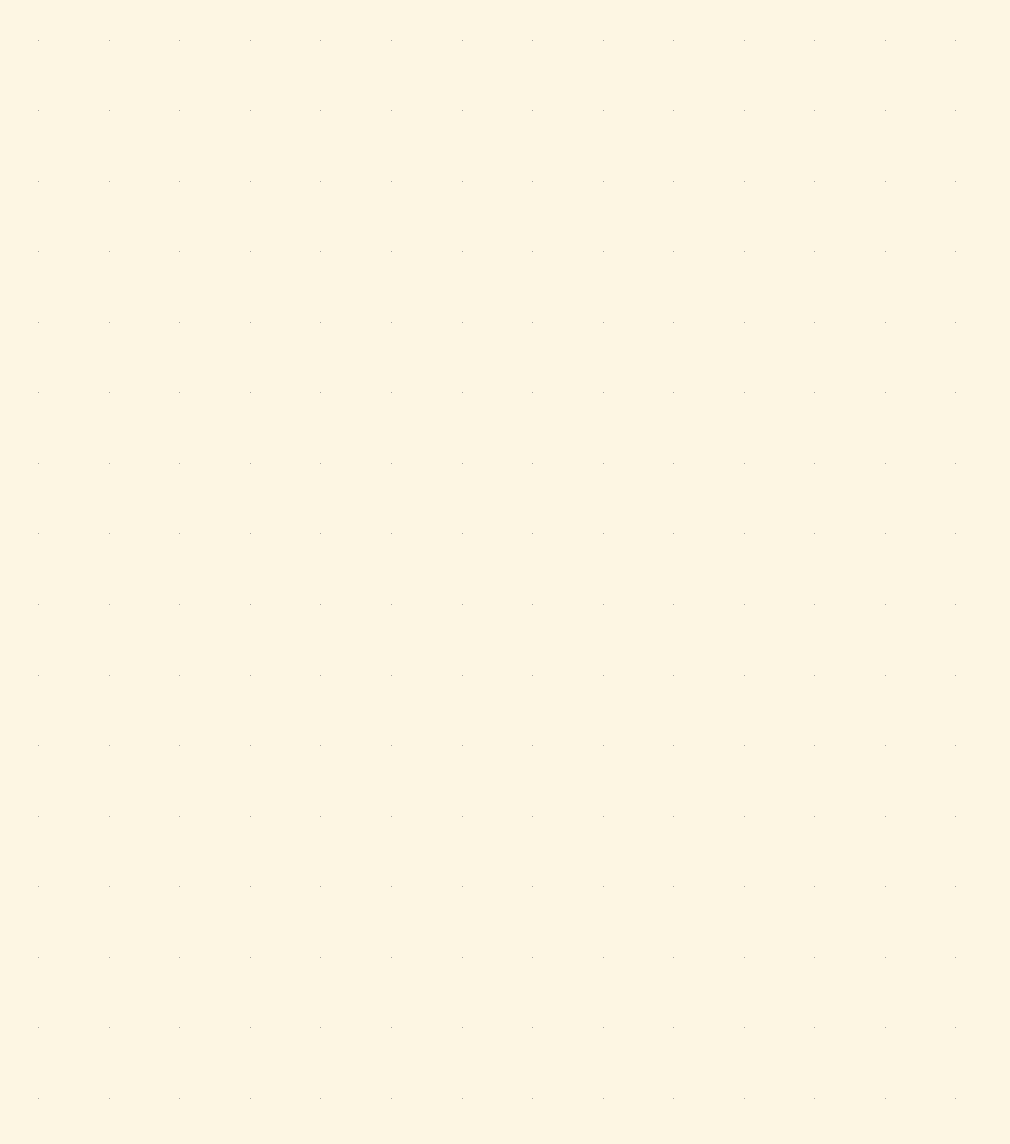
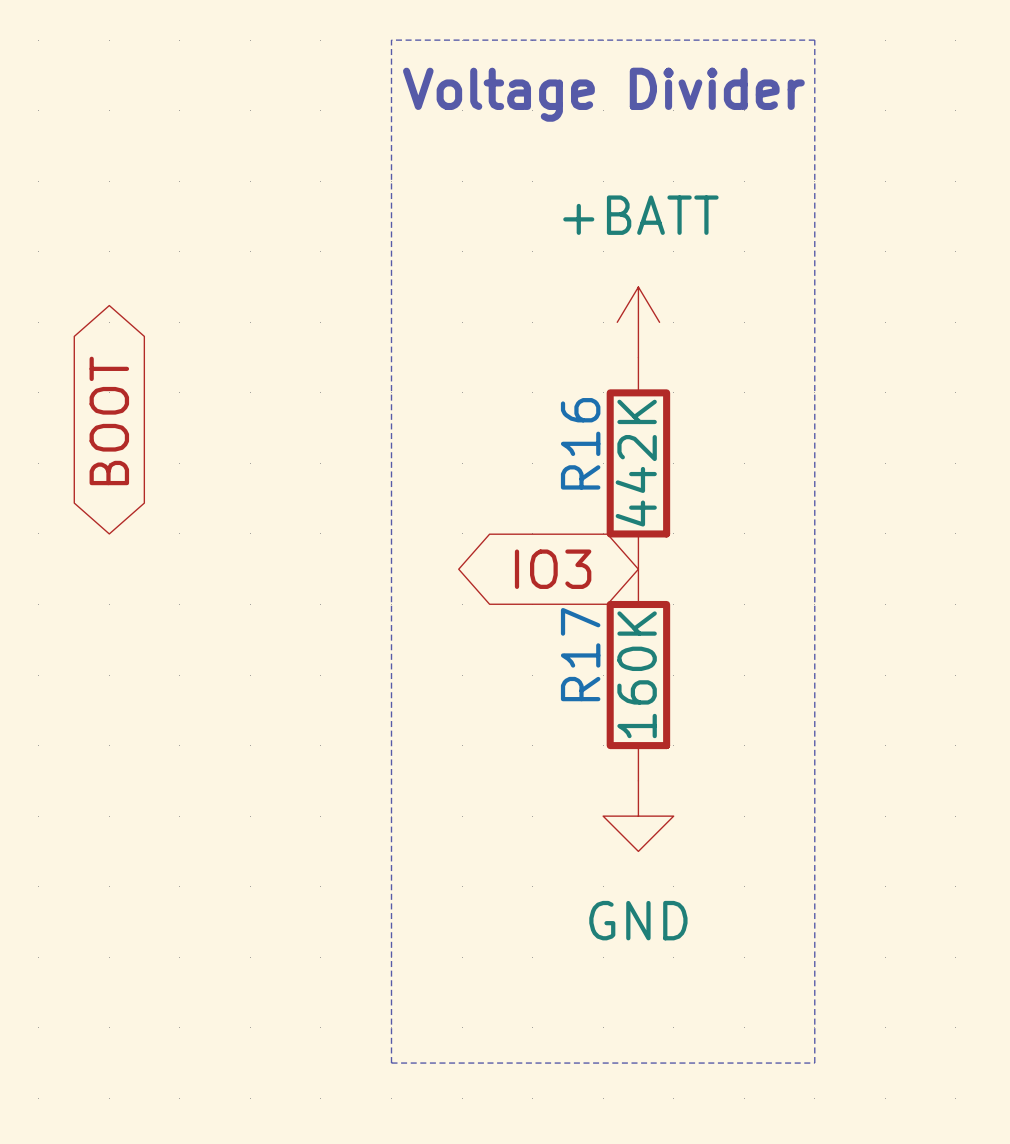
line: none -> (391, 40) (814, 40) (814, 1063) (391, 1063) (391, 40)
text: none -> Voltage Divider (603, 94)
power symbol: none -> +BATT (638, 322)
global label: none -> BOOT (109, 420)
R16: none -> 442K (638, 463)
global label: none -> IO3 (553, 569)
R17: none -> 160K (638, 675)
power symbol: none -> GND (638, 816)

